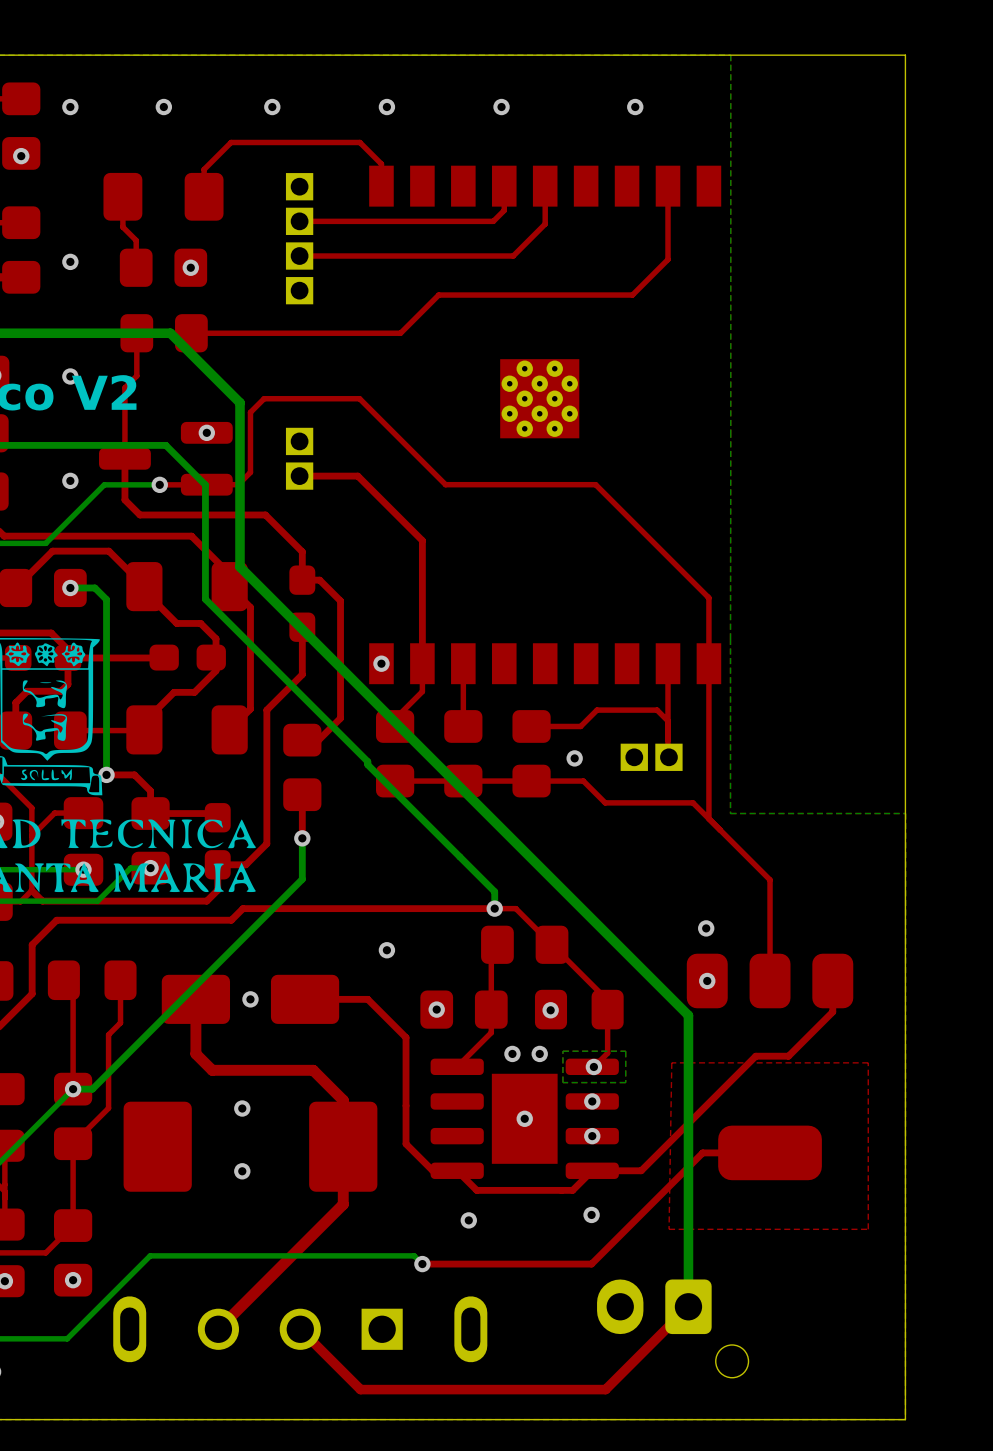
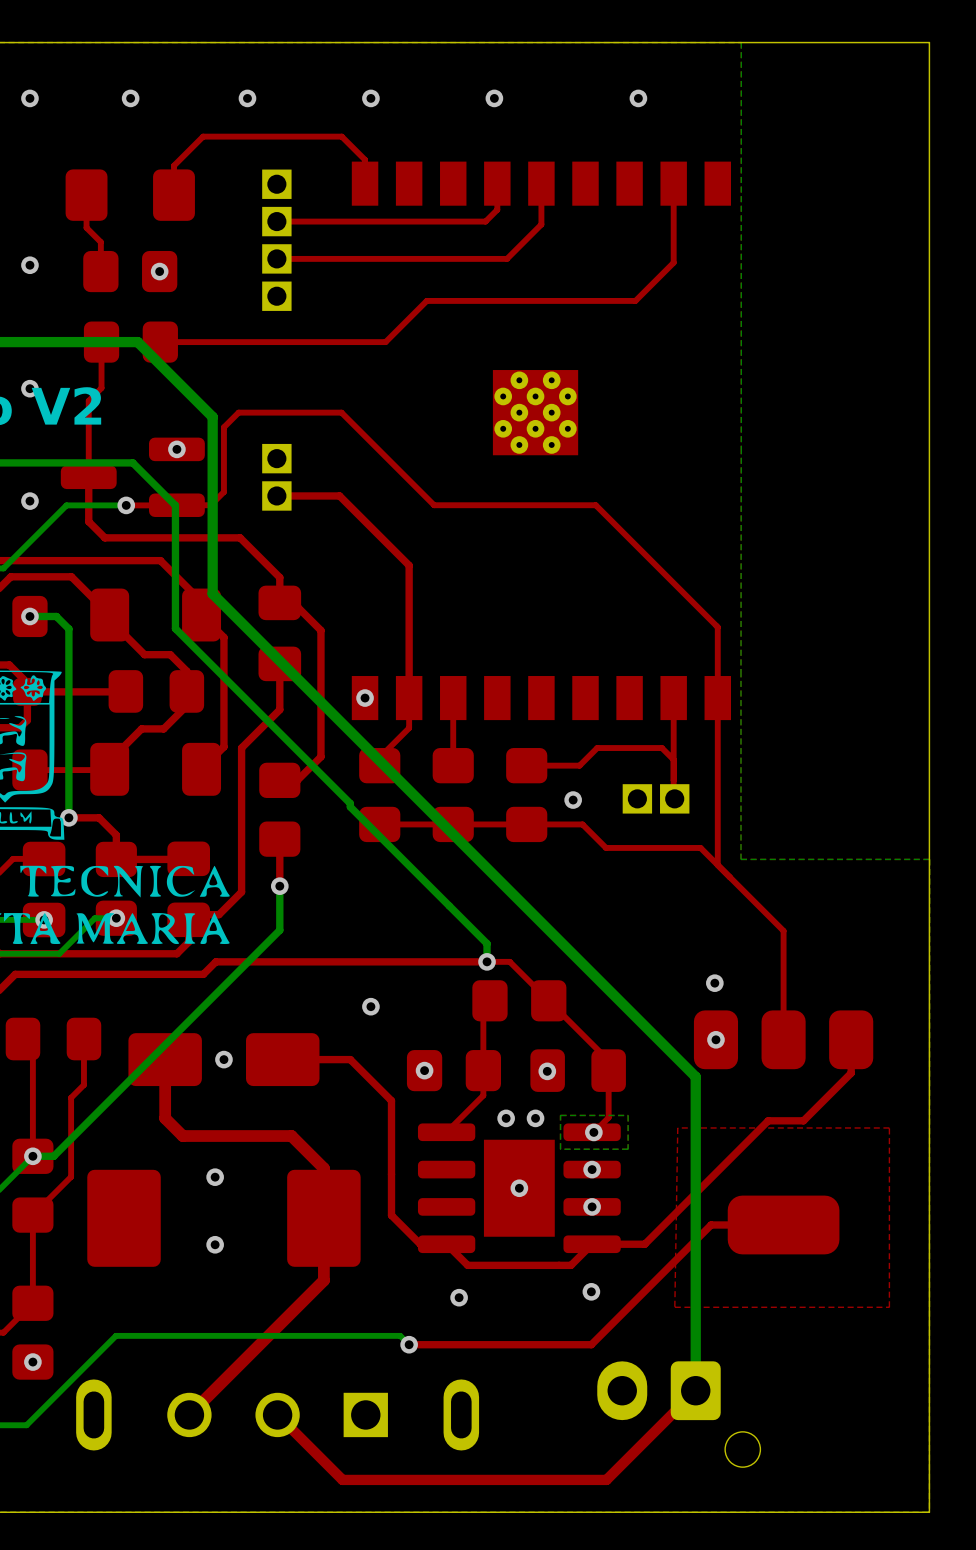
part footprint: [289, 565, 316, 642] -> [258, 585, 302, 682]
part footprint: [149, 644, 226, 671] -> [108, 670, 205, 713]
part footprint: [204, 803, 231, 880] -> [167, 841, 211, 938]

